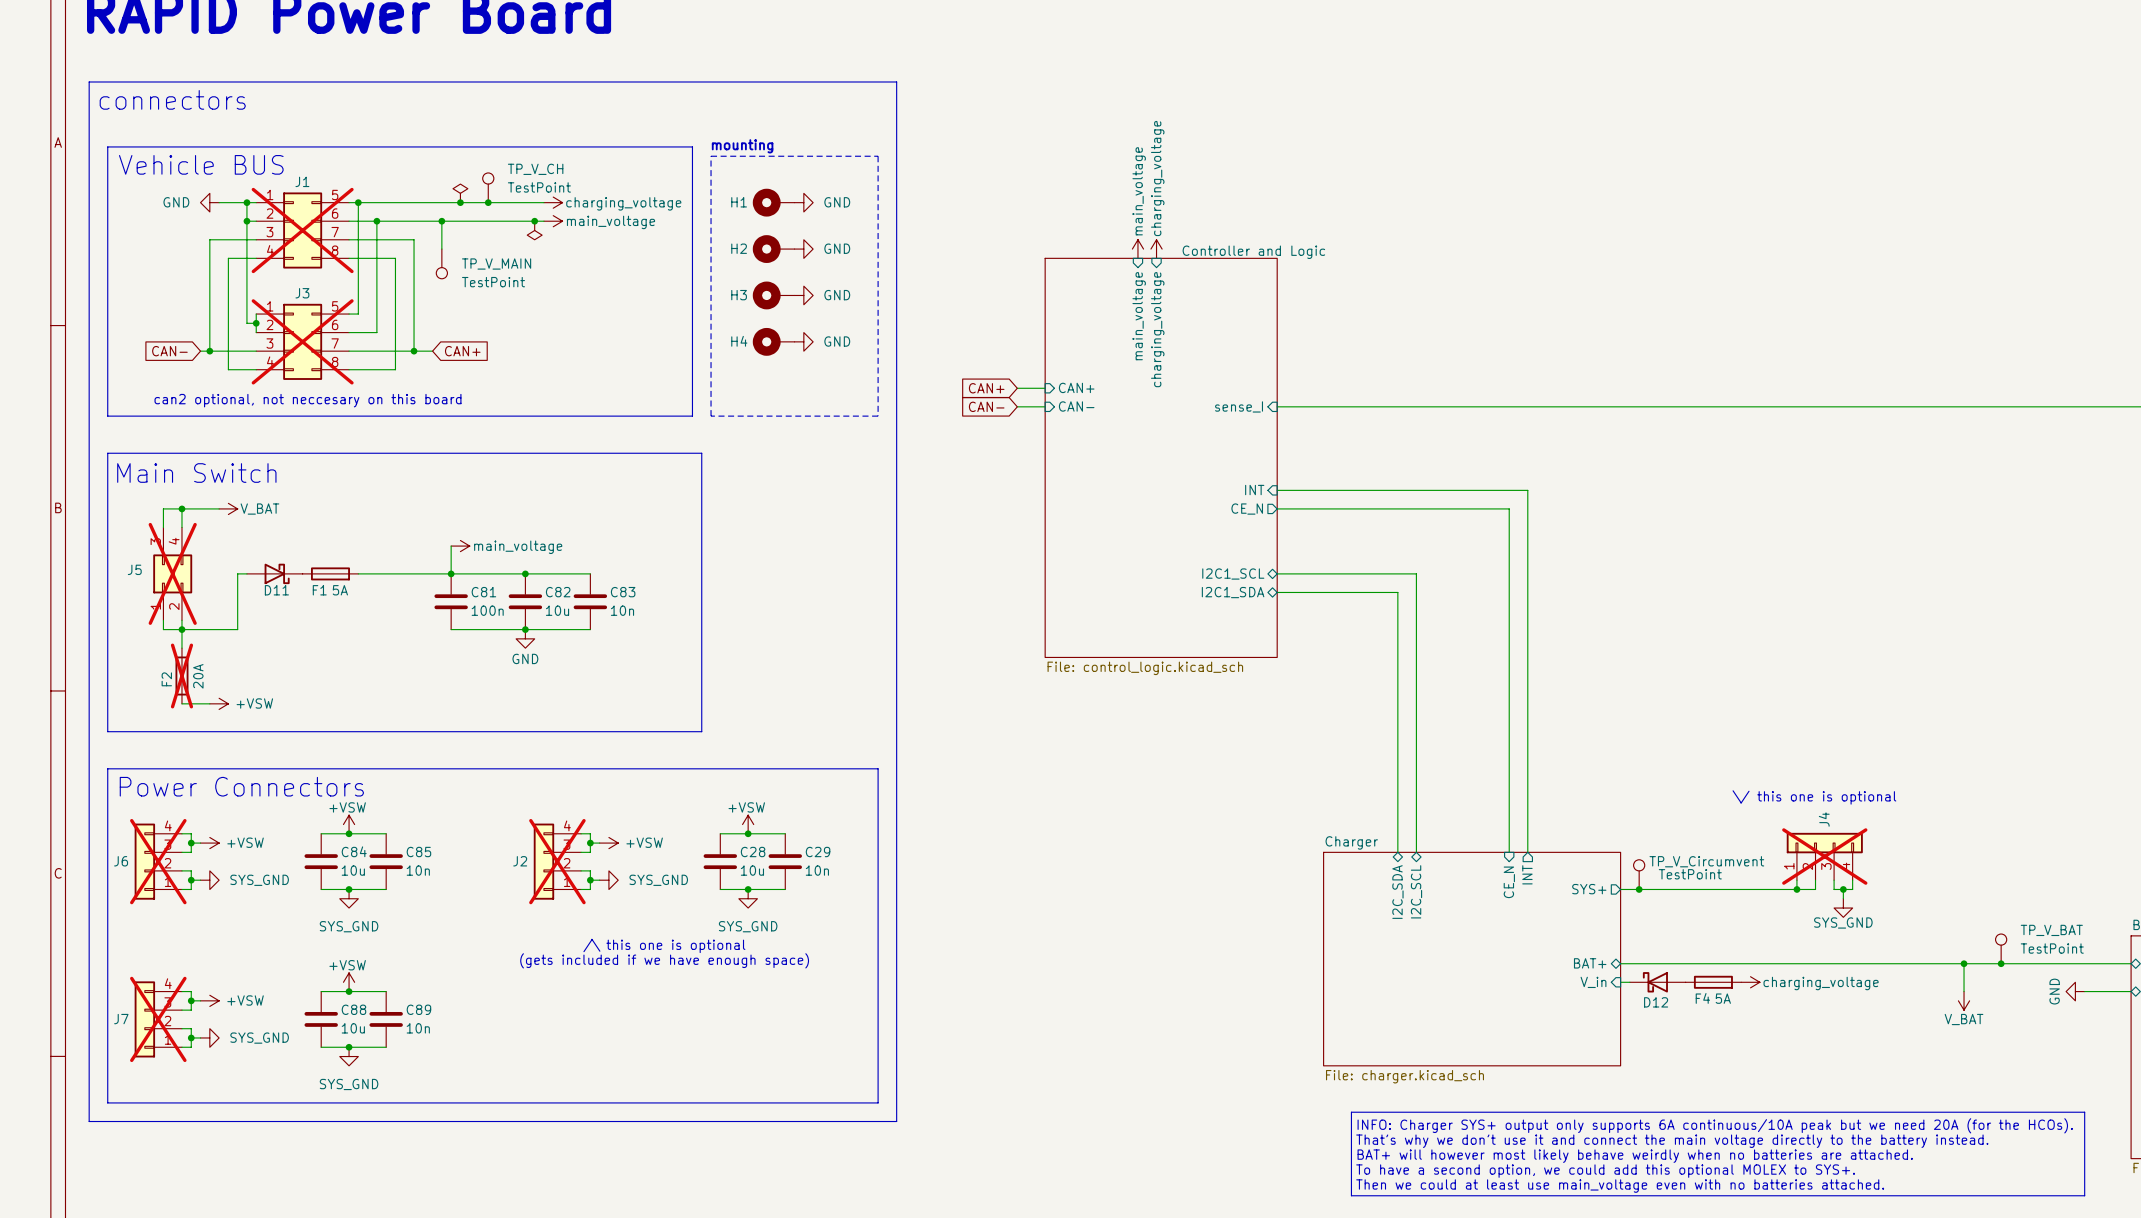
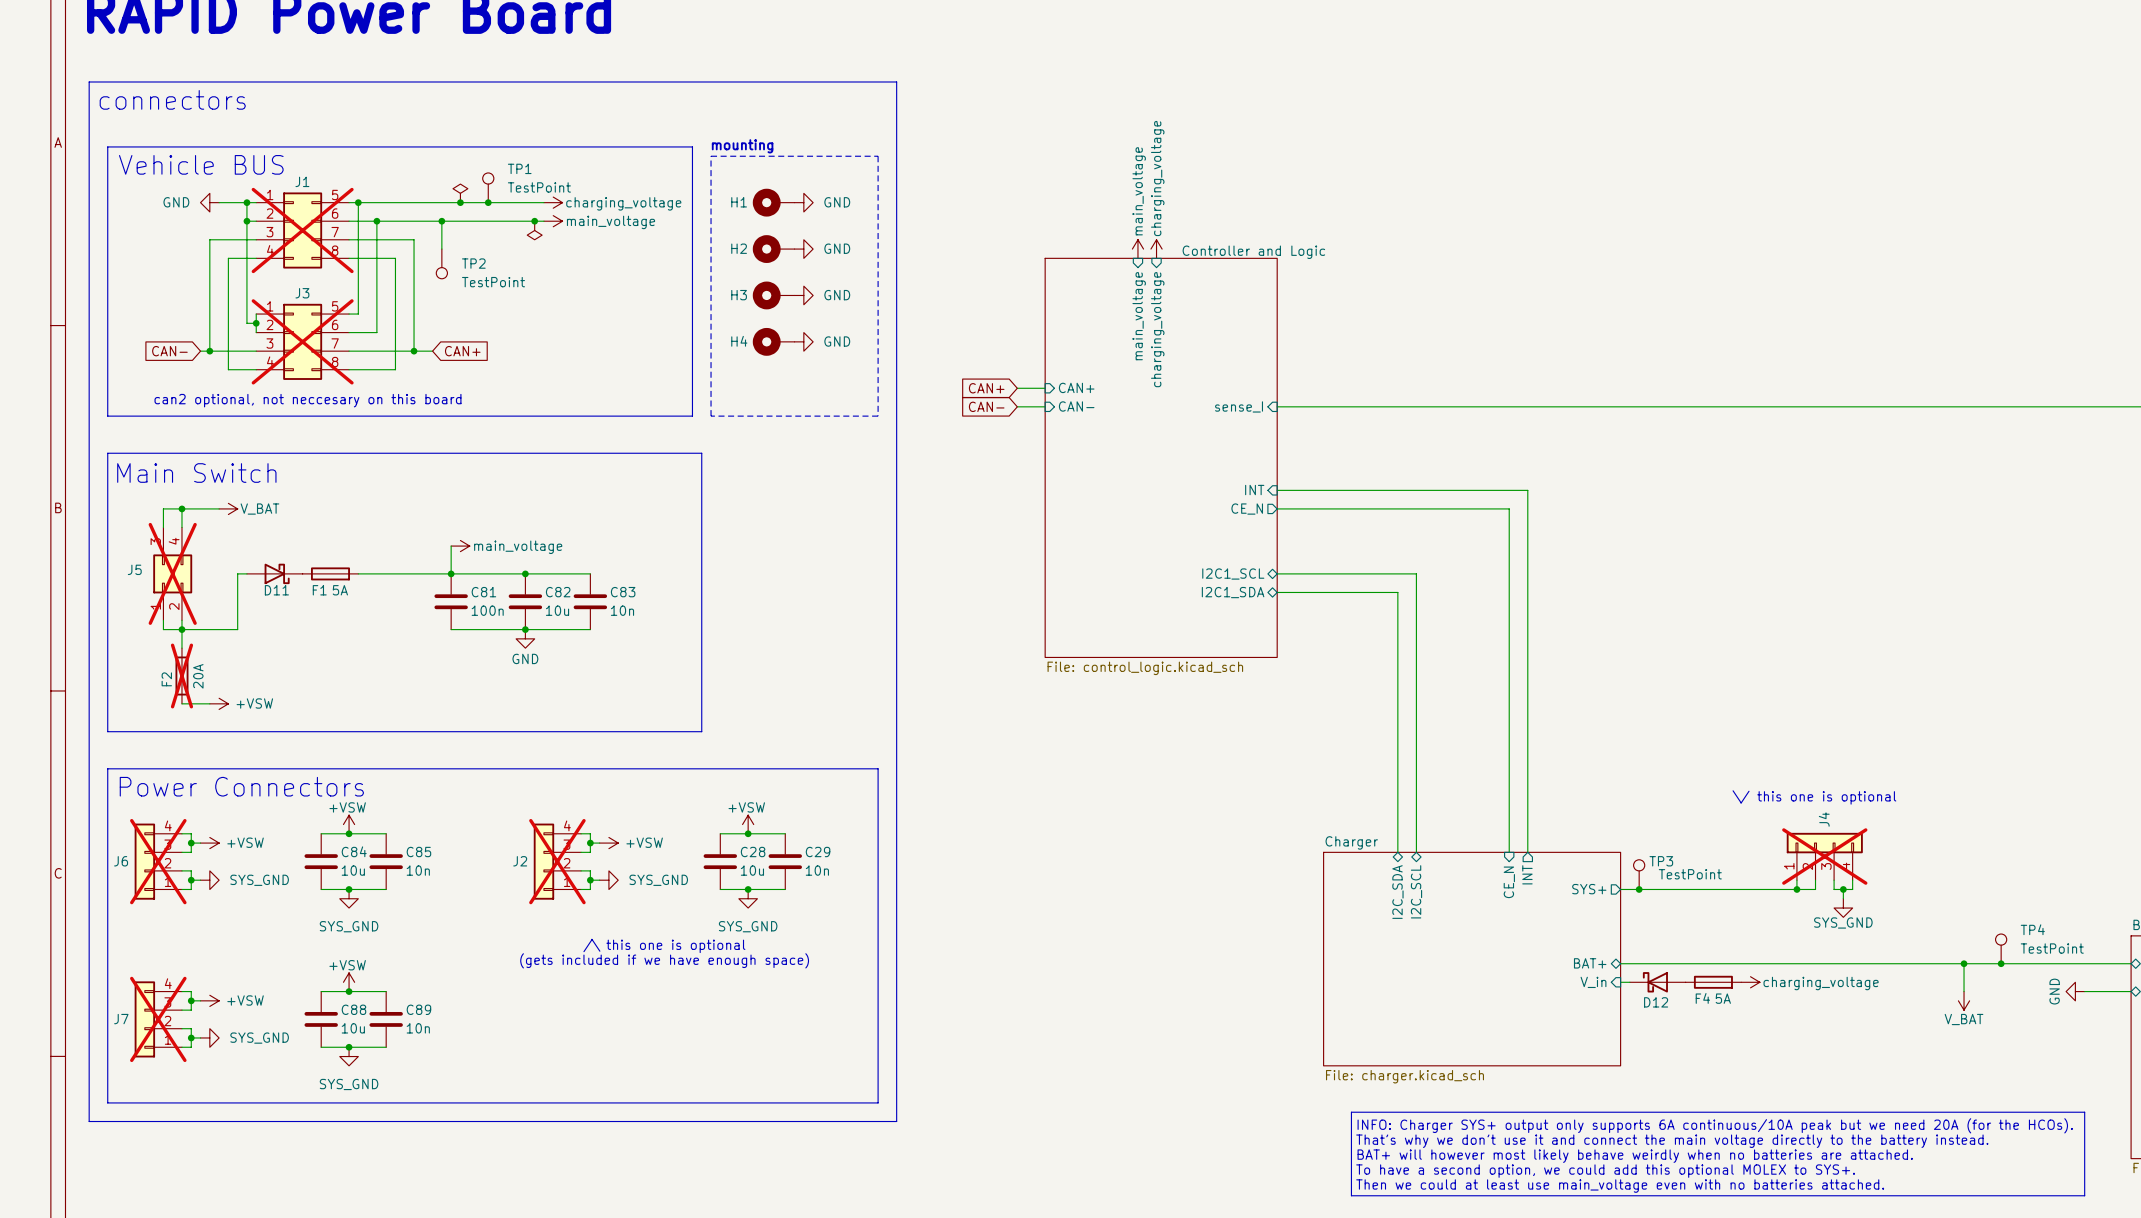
TP_V_CH name: TP_V_CH (535, 169) -> TP1 (519, 168)
TP_V_MAIN name: TP_V_MAIN (496, 264) -> TP2 (473, 263)
TP_V_Circumvent name: TP_V_Circumvent (1706, 861) -> TP3 (1661, 861)
TP_V_BAT name: TP_V_BAT (2051, 930) -> TP4 (2032, 929)

